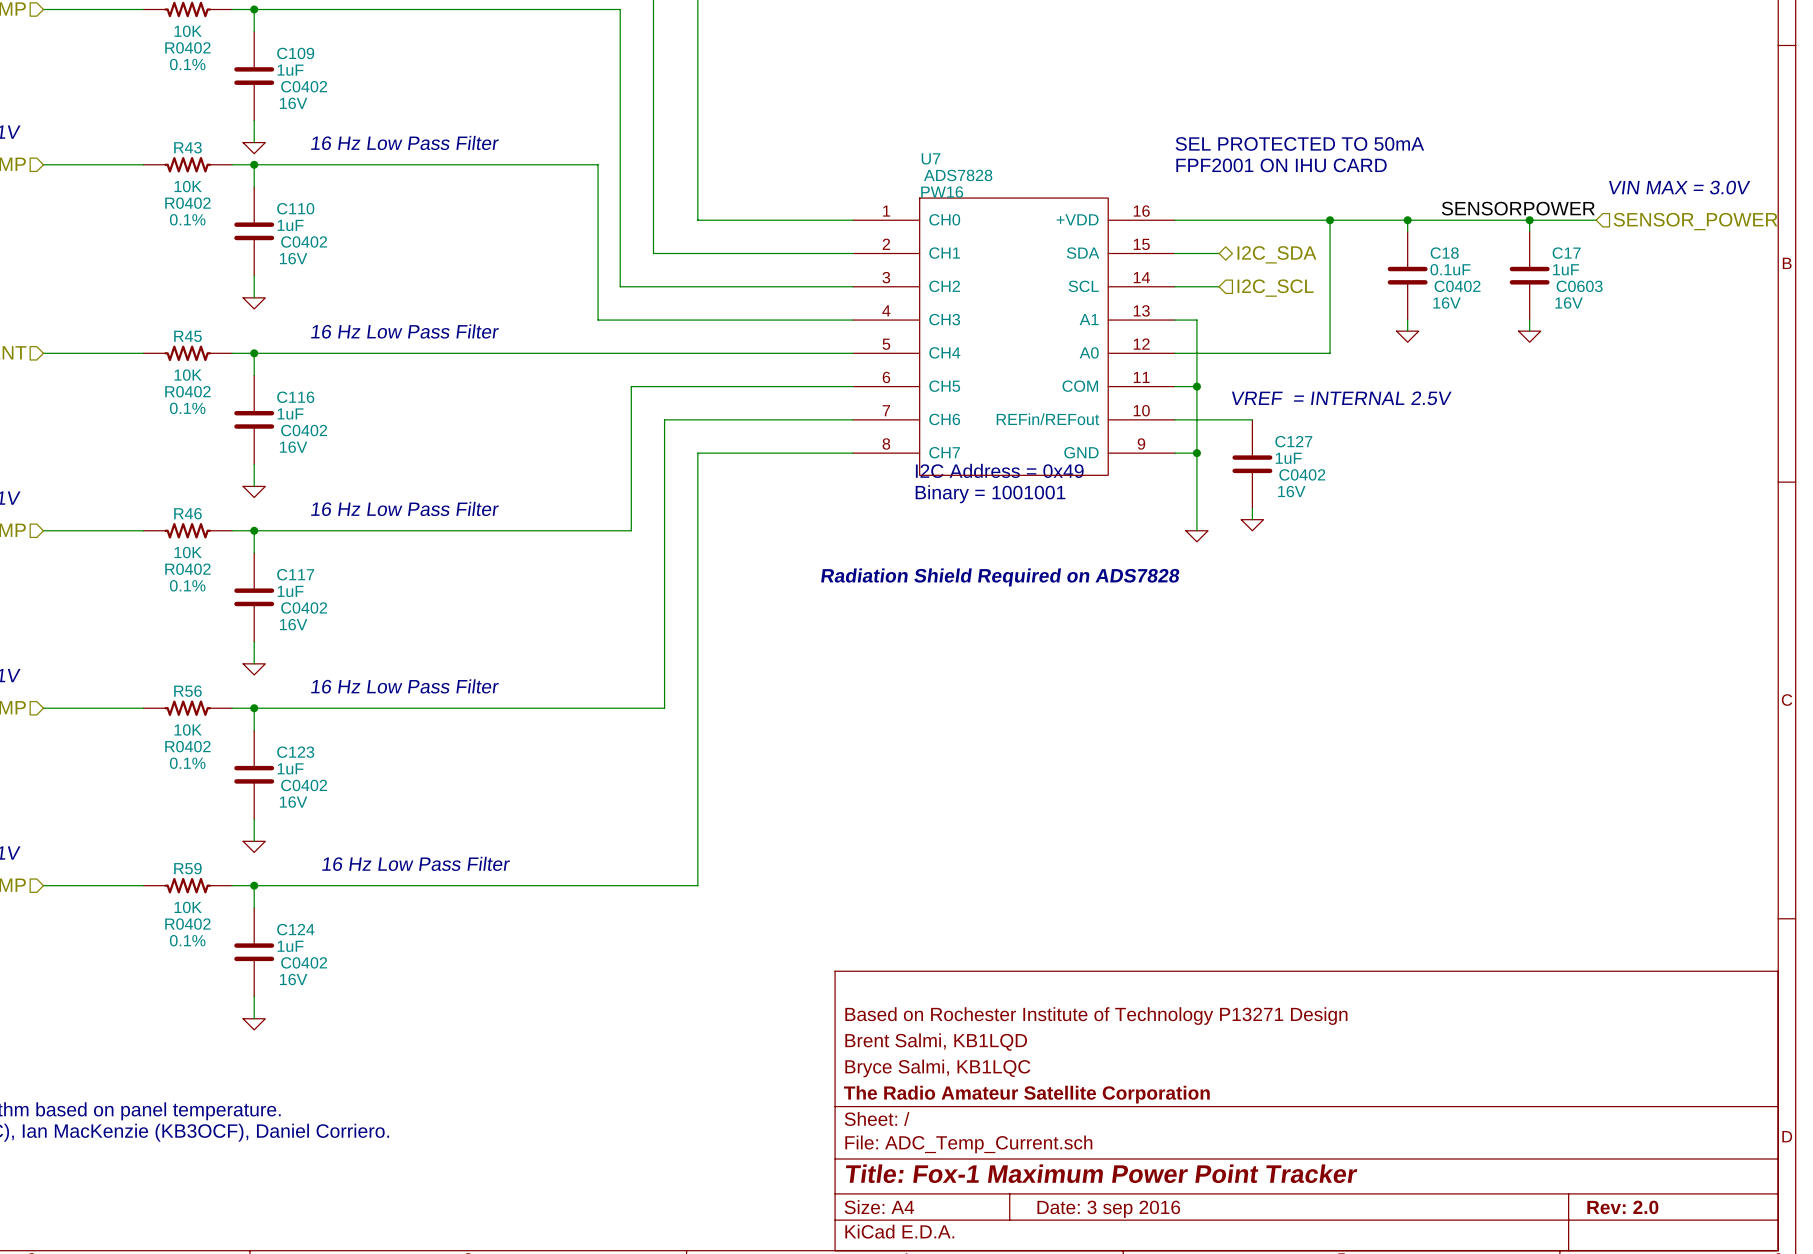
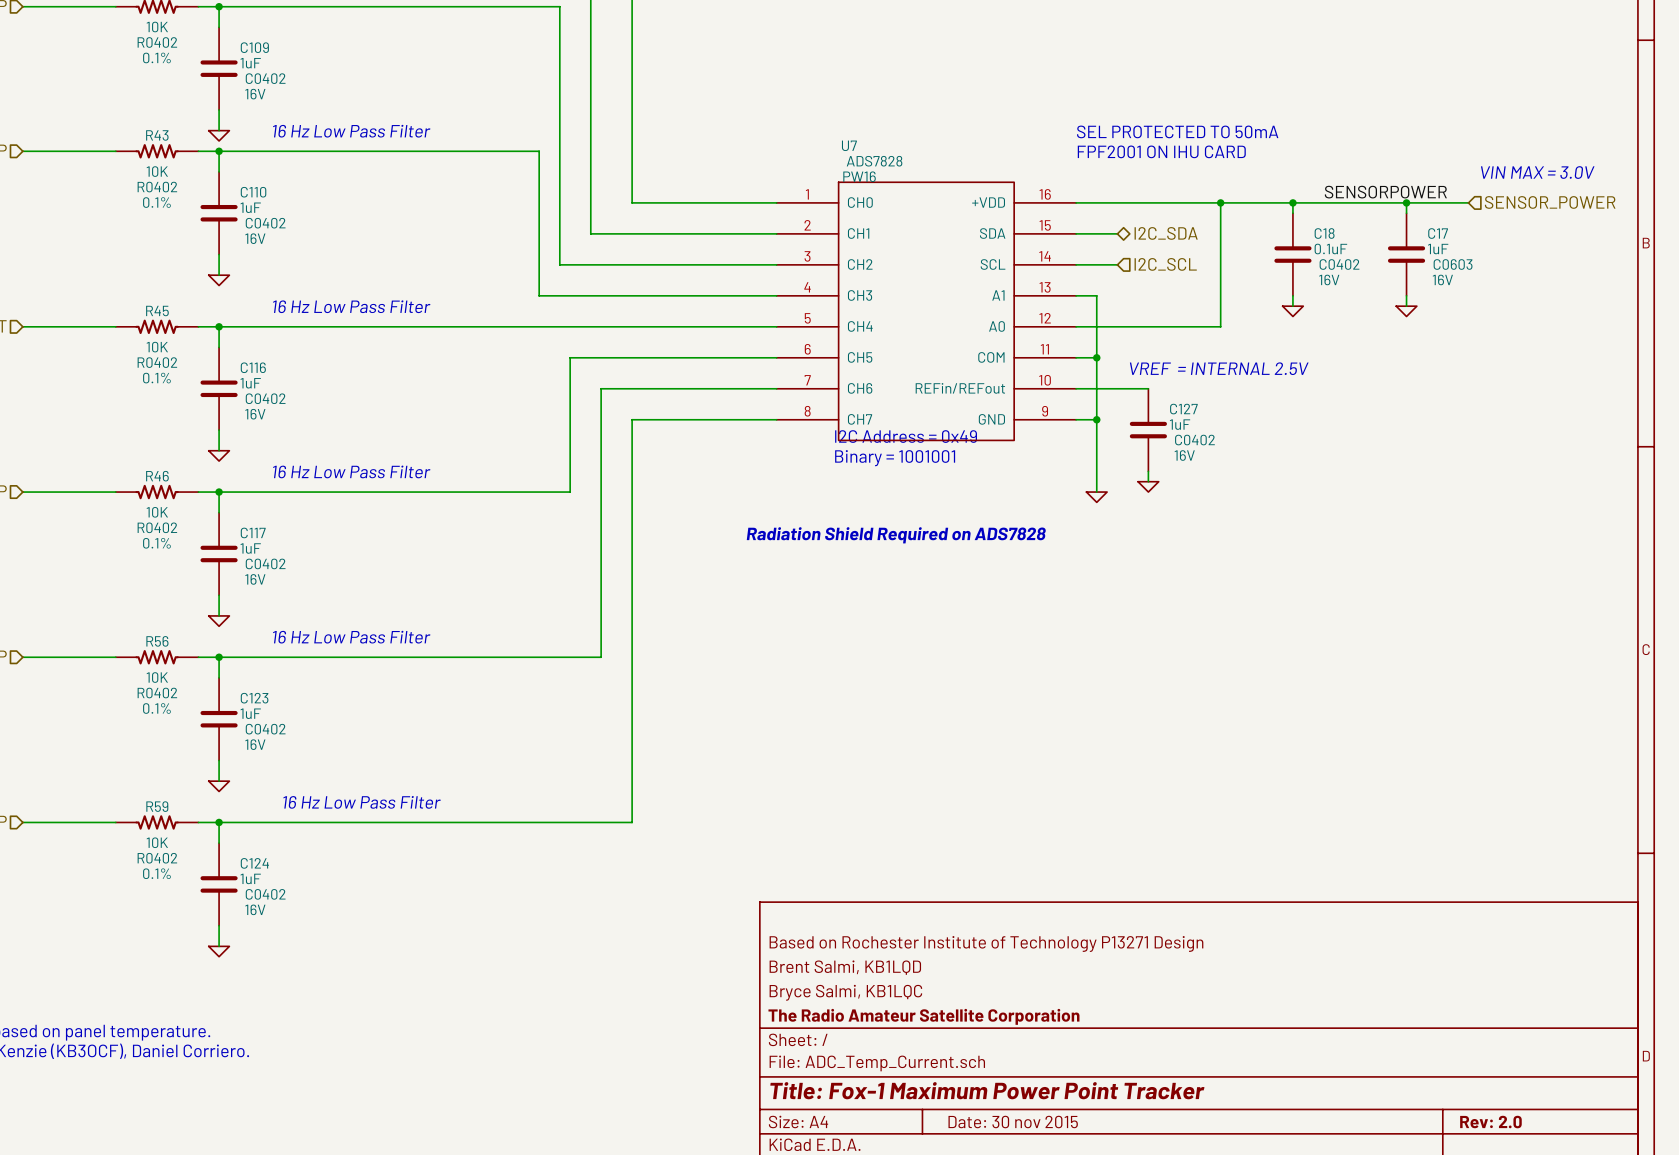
title block: Date: 3 sep 2016 (1108, 1209) -> Date: 30 nov 2015 (1013, 1122)

